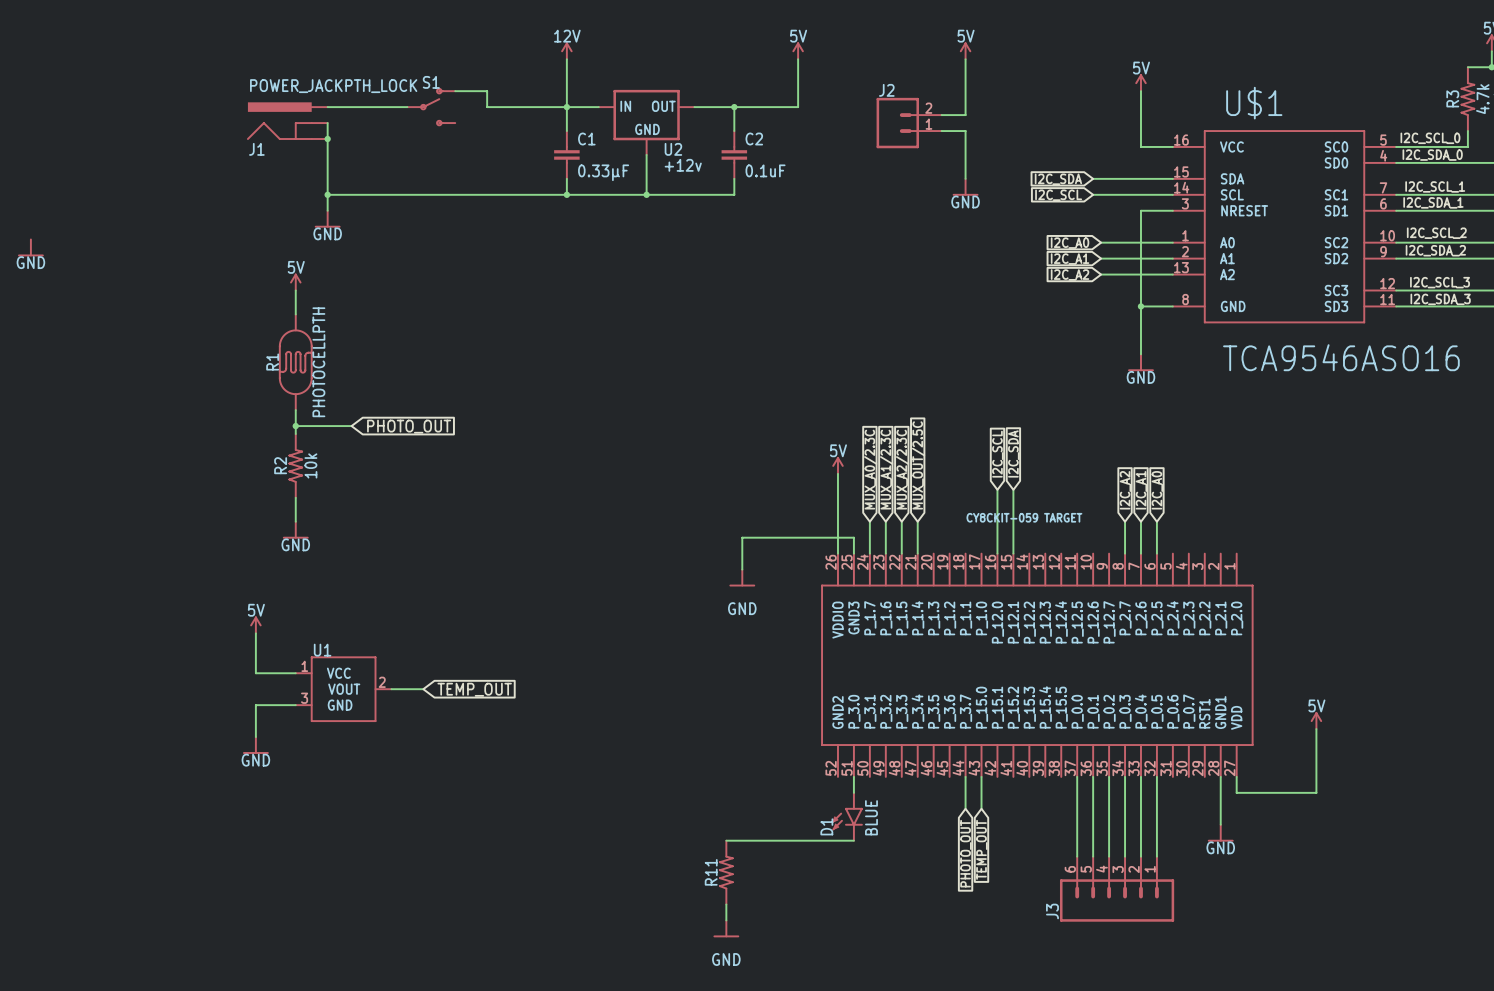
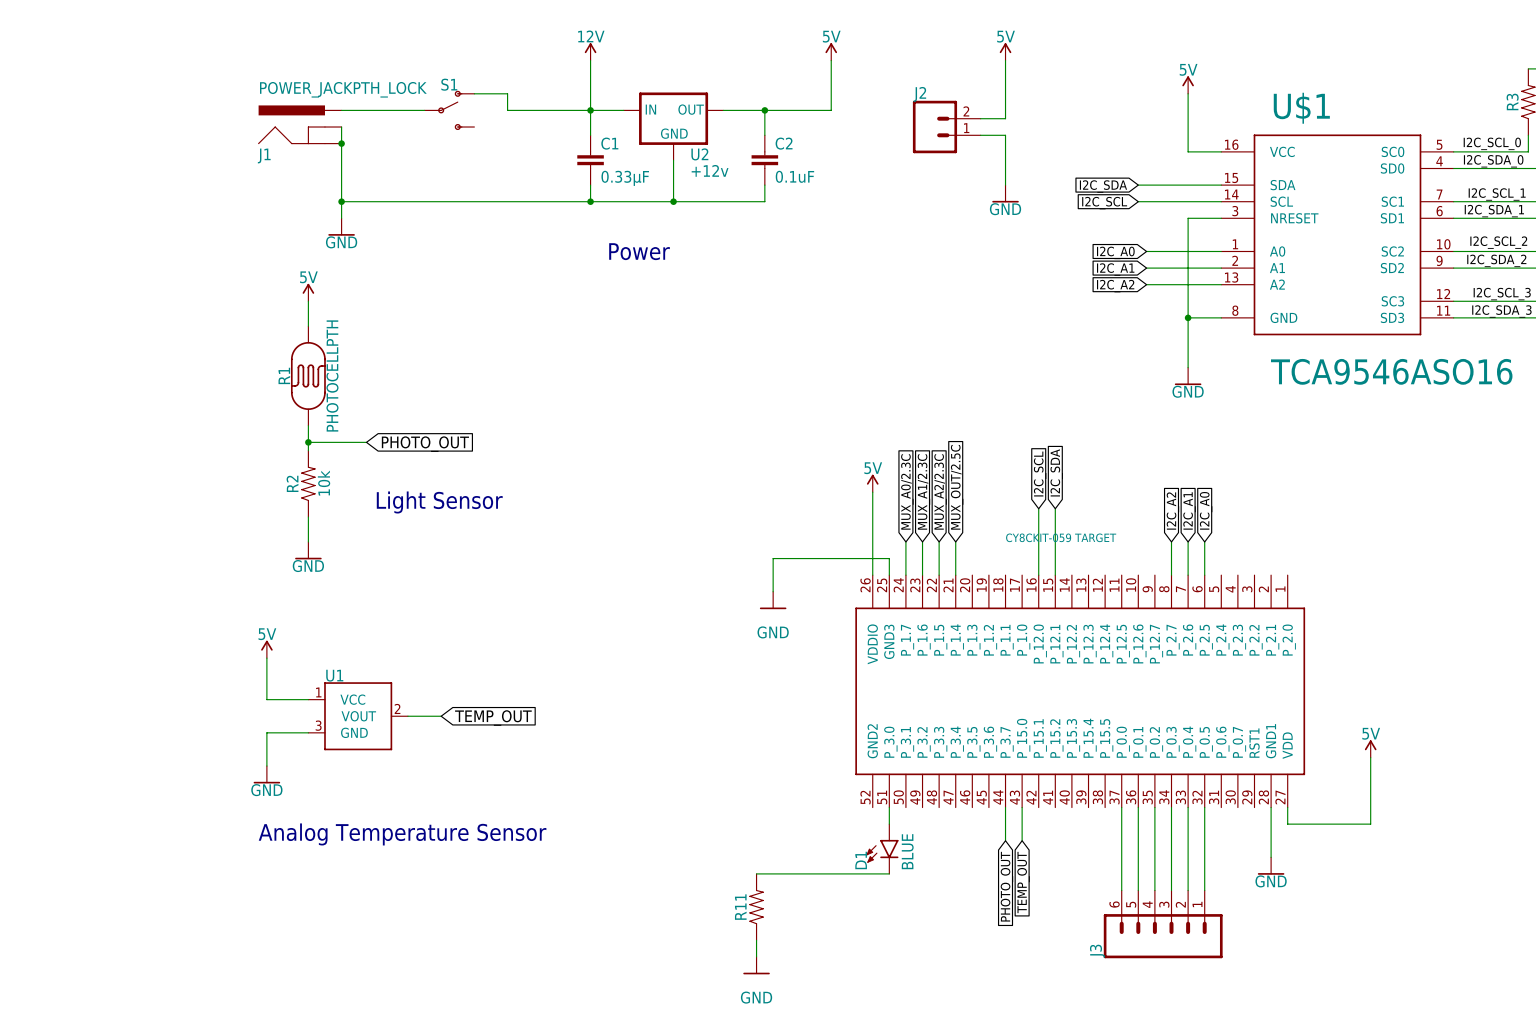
text: none -> Power (639, 251)
power symbol: GND (30, 247) -> none
text: none -> Light Sensor (439, 502)
text: none -> Analog Temperature Sensor (402, 834)

